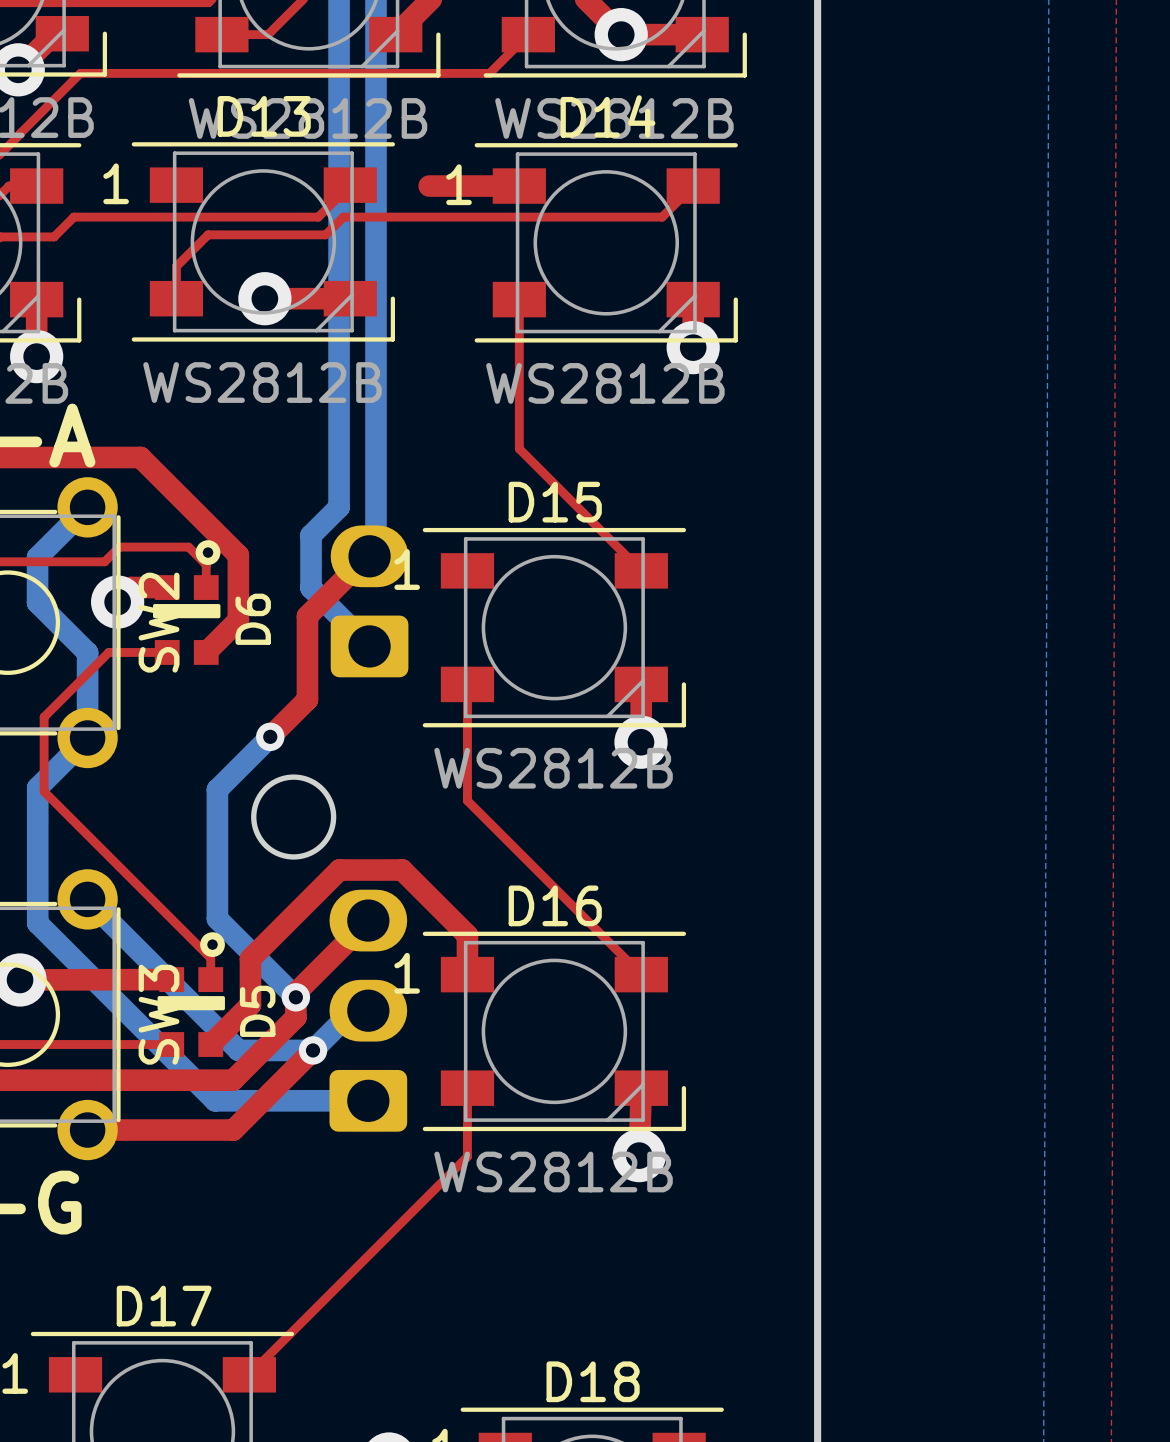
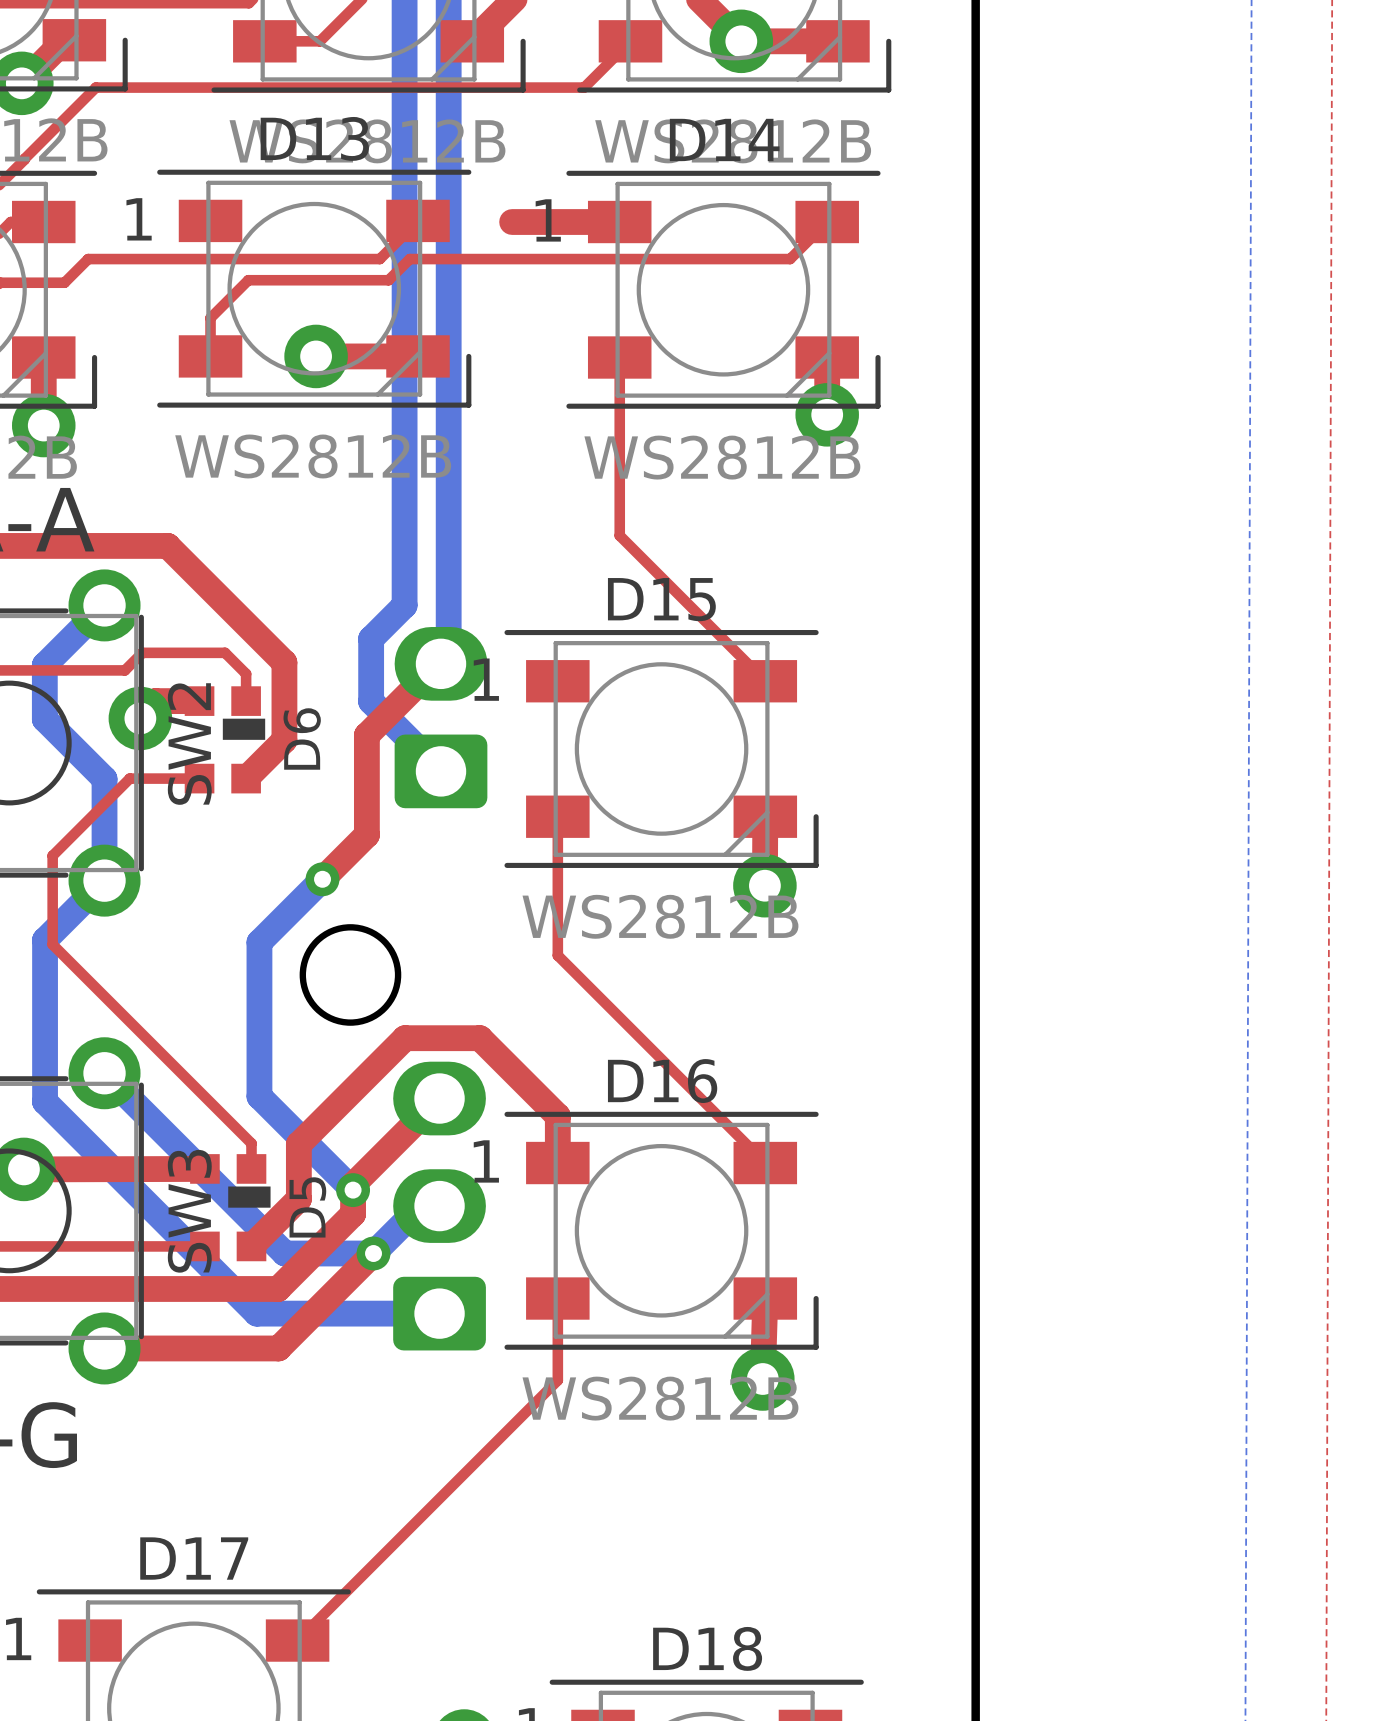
D6 footprint: [153, 540, 221, 665] -> [184, 686, 266, 794]
D5 footprint: [157, 932, 225, 1057] -> [190, 1154, 271, 1262]

